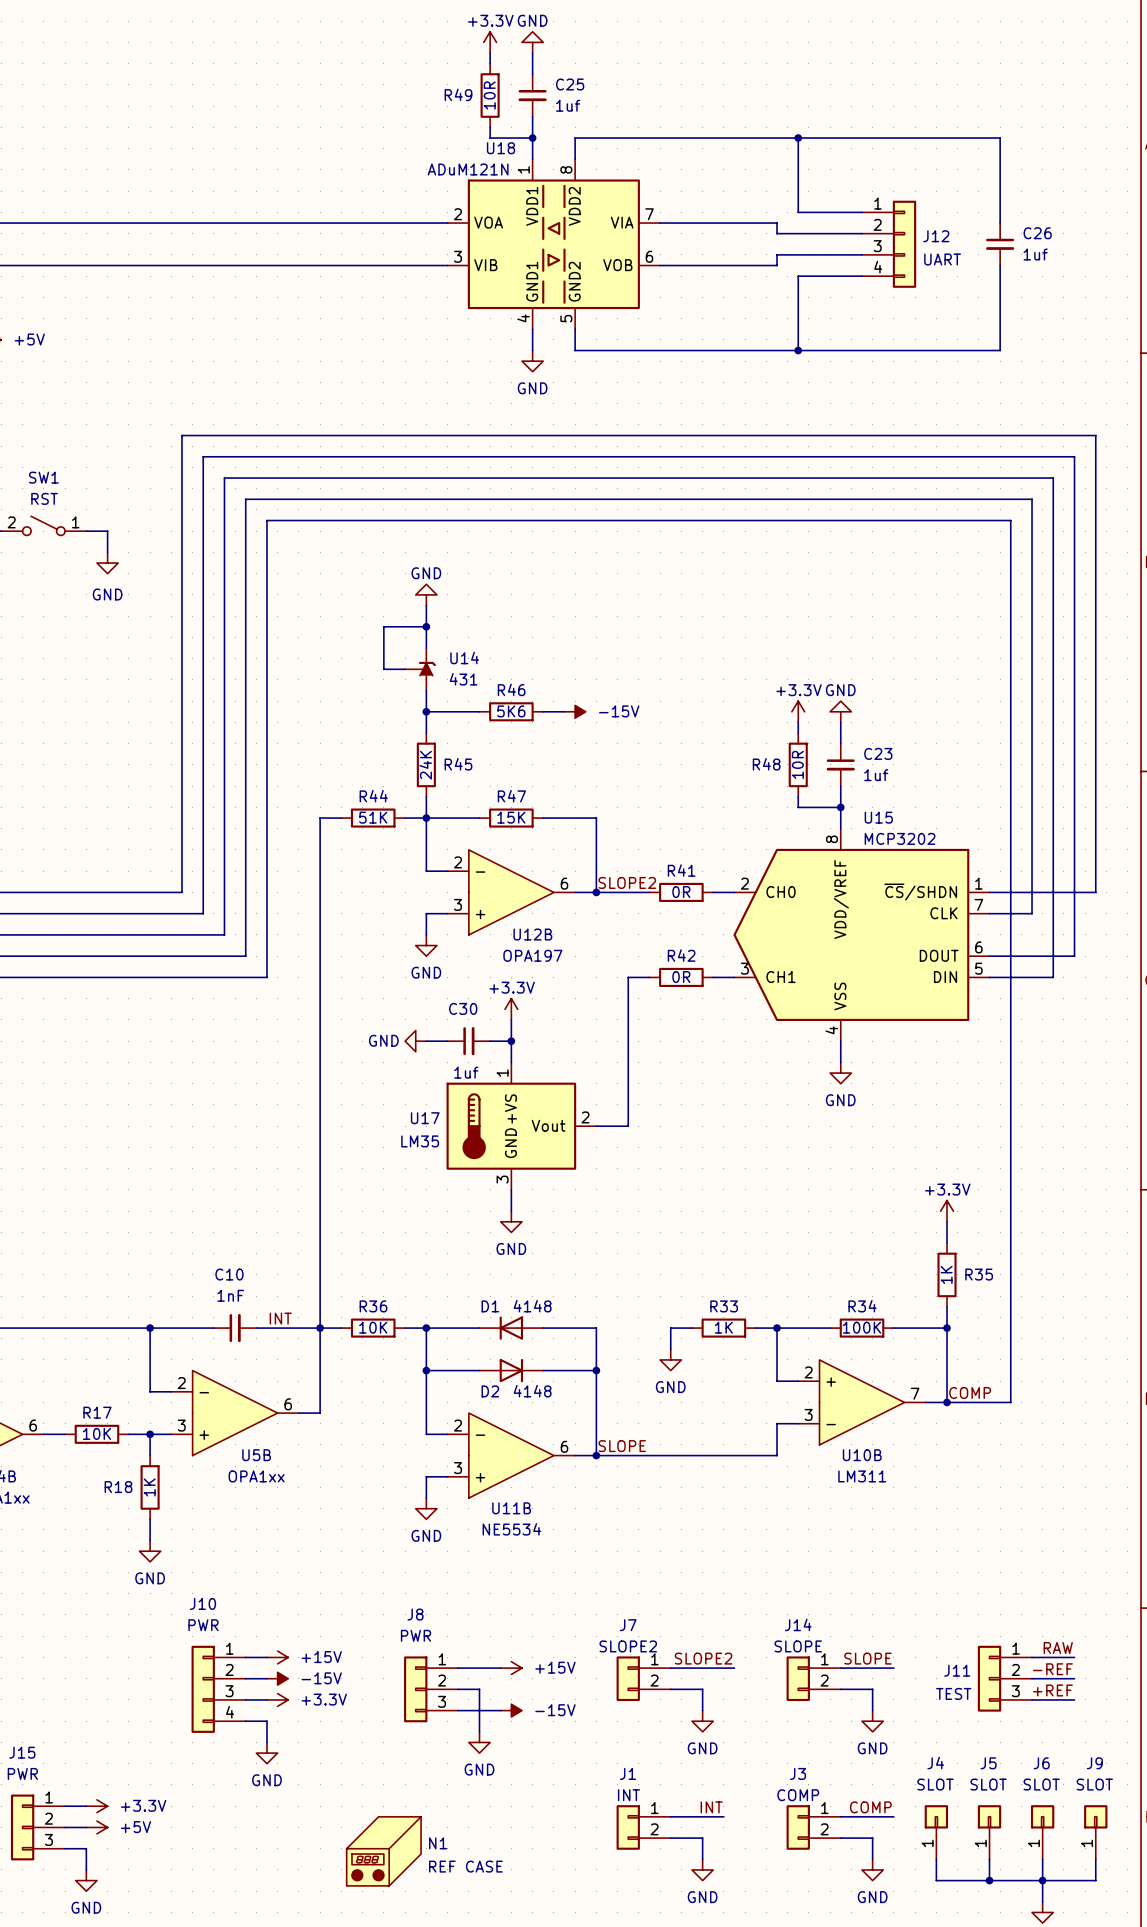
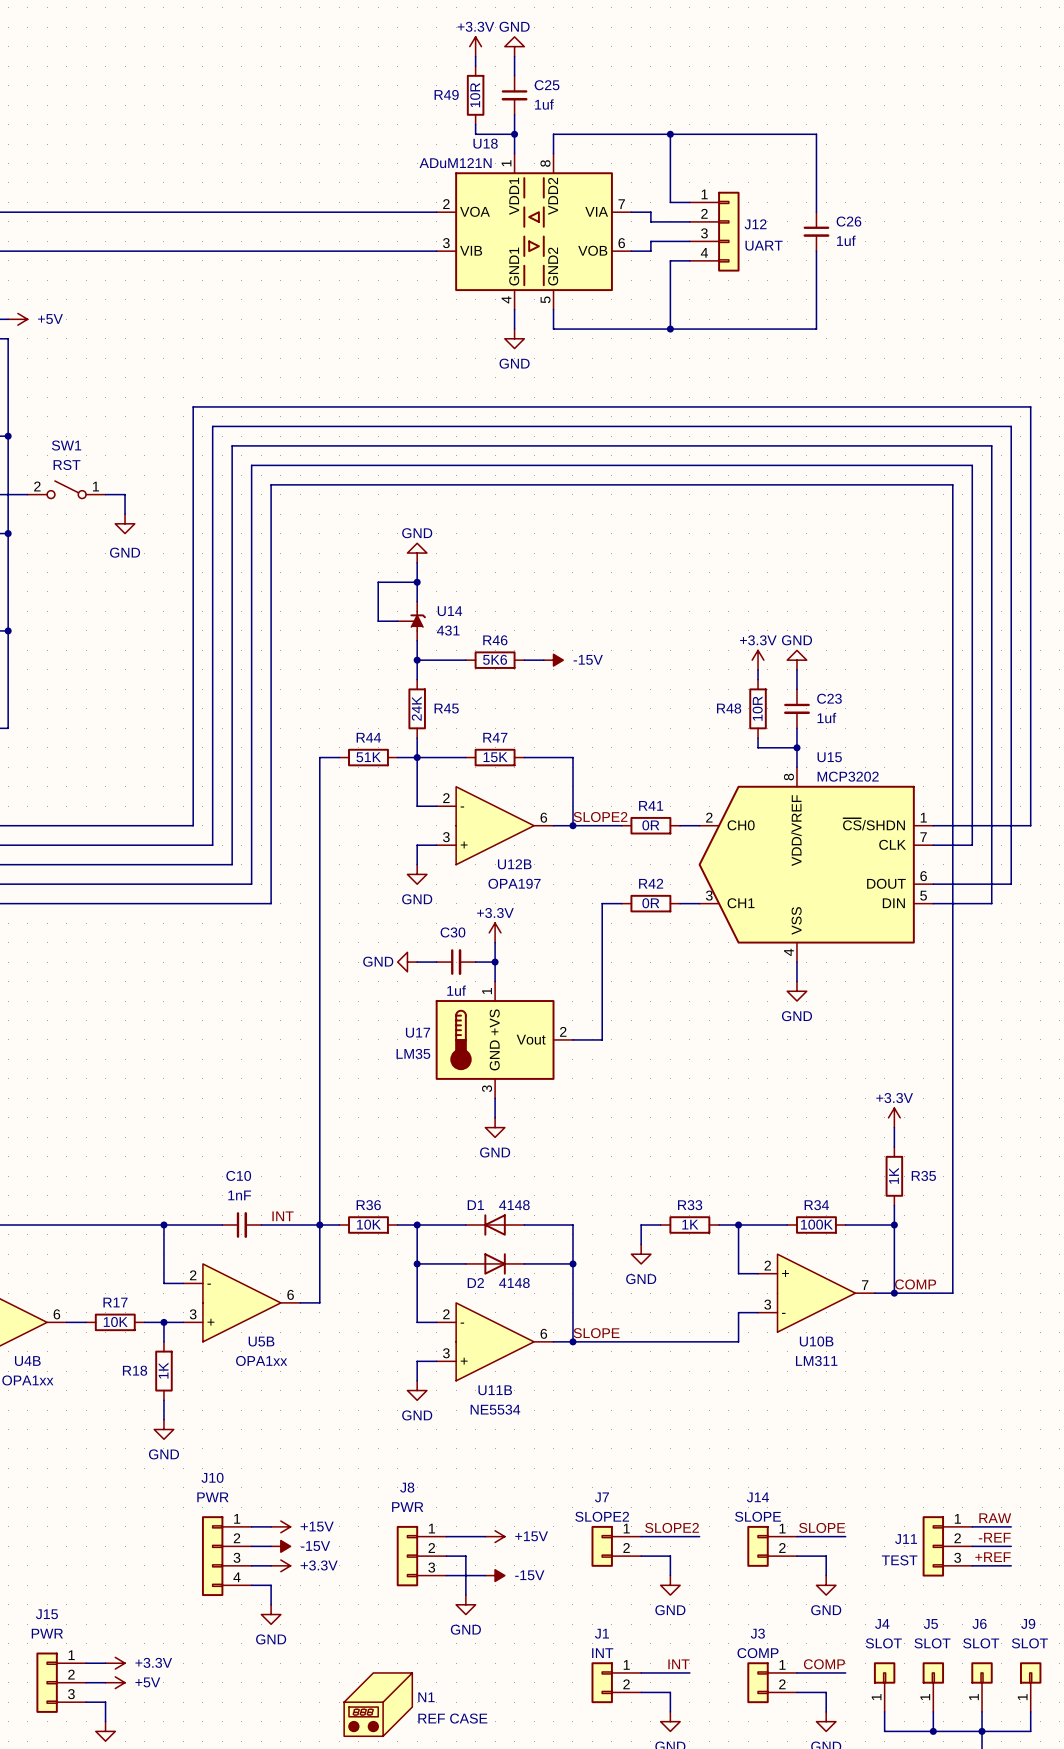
wire: none -> (670, 134) (670, 202) (689, 202)
junction: none -> (670, 134)
wire: (798, 138) (798, 212) (862, 212) -> none
junction: (798, 138) -> none
wire: (862, 138) (1000, 138) (1000, 223) -> (816, 134) (816, 212)
wire: (681, 223) (777, 223) (777, 233) (862, 233) -> (650, 212) (650, 221) (689, 221)
J12 position: (889, 244) -> (714, 231)
C26 position: (1000, 244) -> (816, 231)
wire: (862, 254) (777, 254) (777, 265) (681, 265) -> (689, 241) (650, 241) (650, 251)
wire: (1000, 265) (1000, 350) (862, 350) -> (816, 251) (816, 329)
wire: none -> (689, 260) (670, 260) (670, 329)
wire: (862, 276) (798, 276) (798, 350) -> none
junction: none -> (670, 329)
junction: (798, 350) -> none

